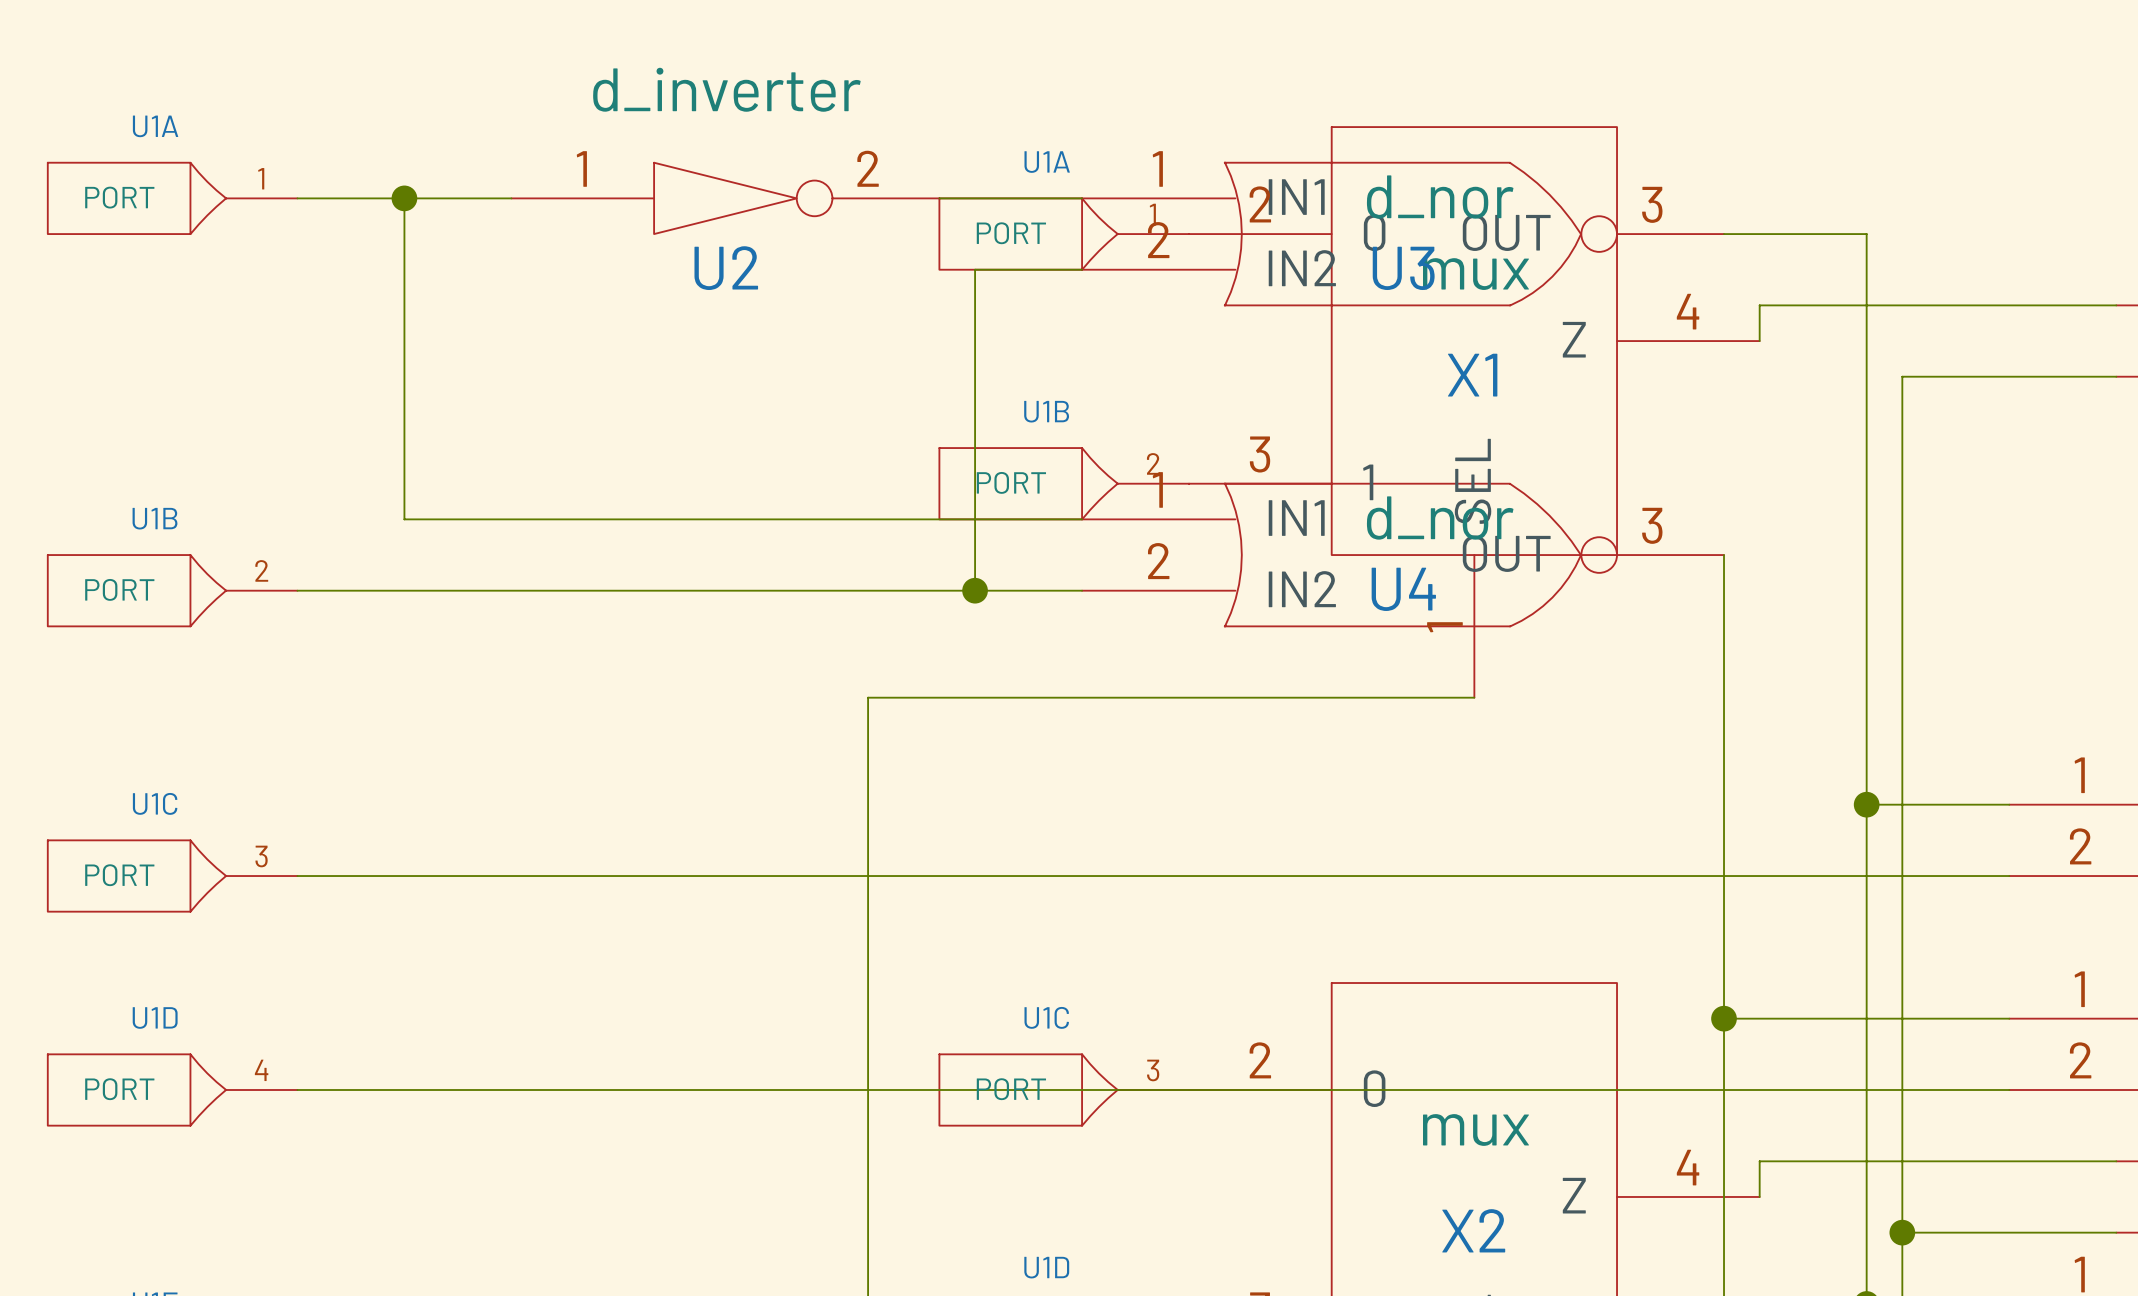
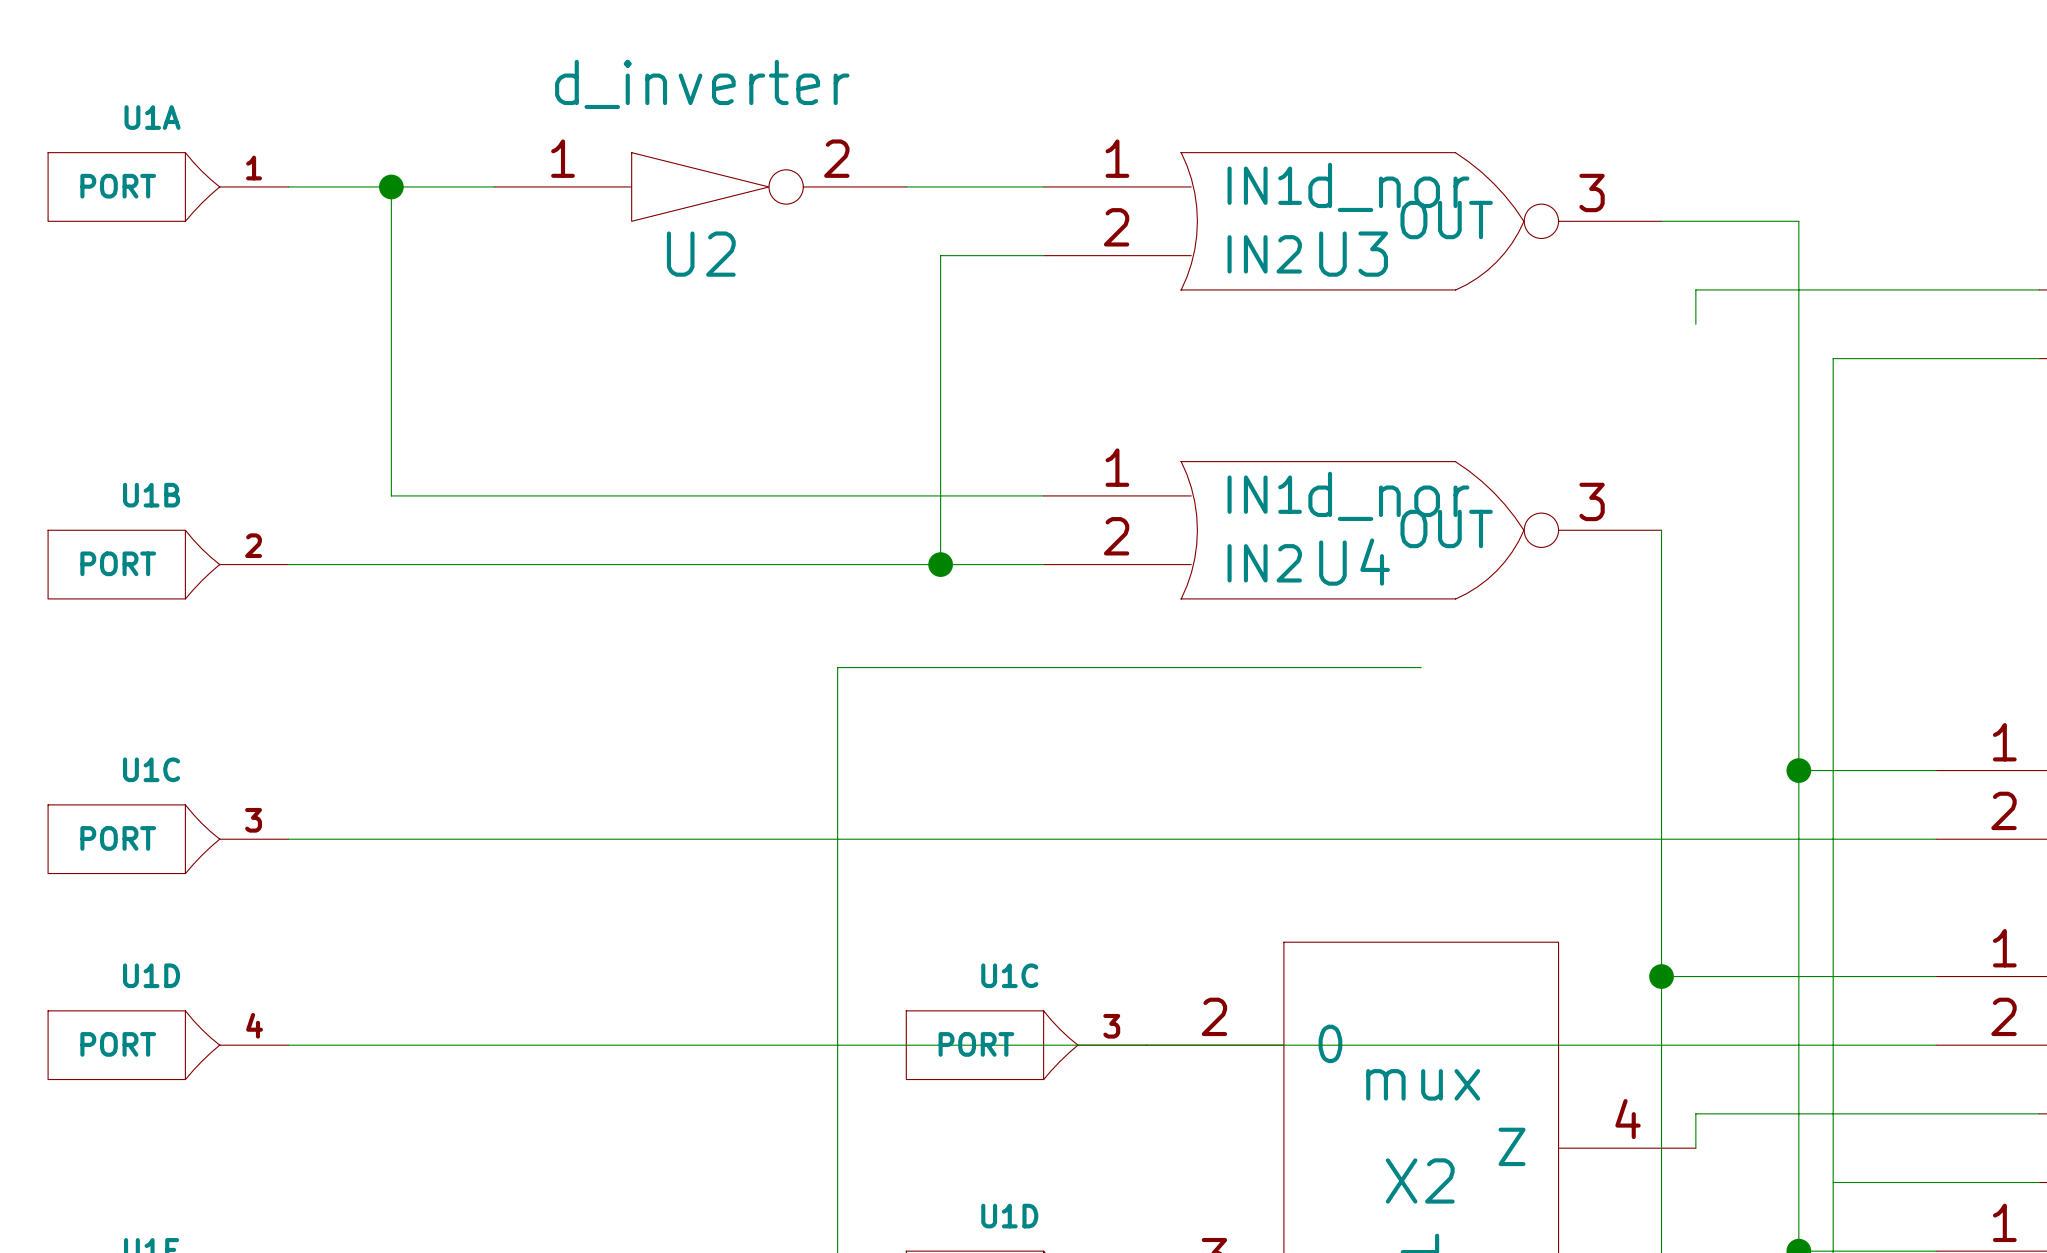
U1A: PORT (1064, 234) -> none
X1: mux (1474, 412) -> none
U1B: PORT (1064, 483) -> none
junction: (1902, 1232) -> none

